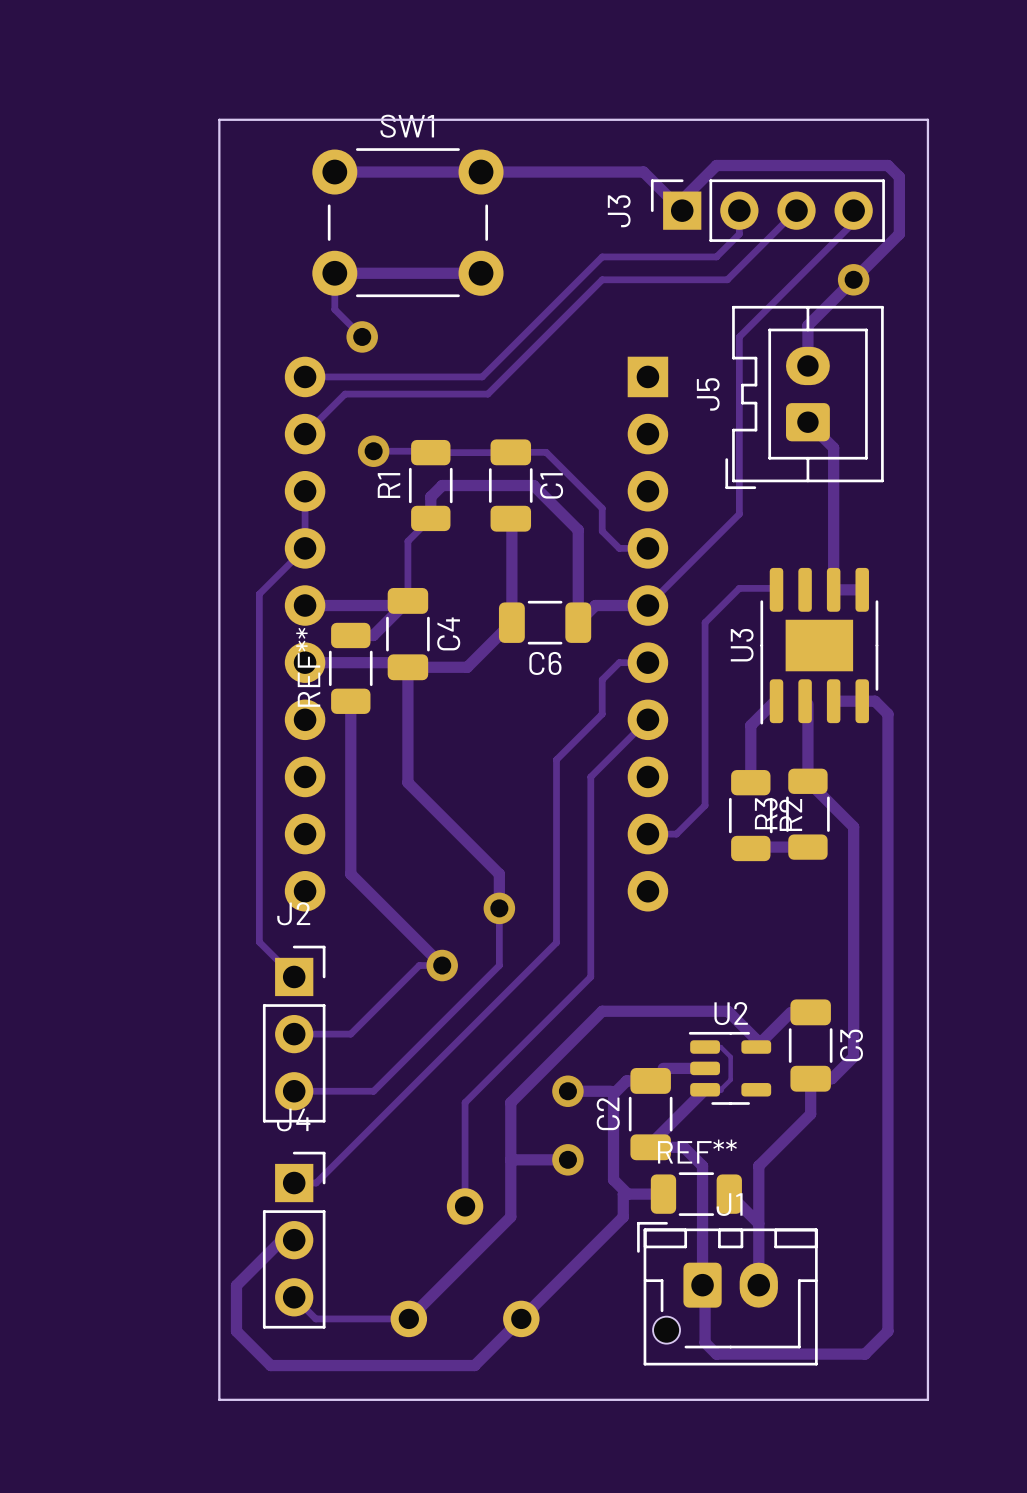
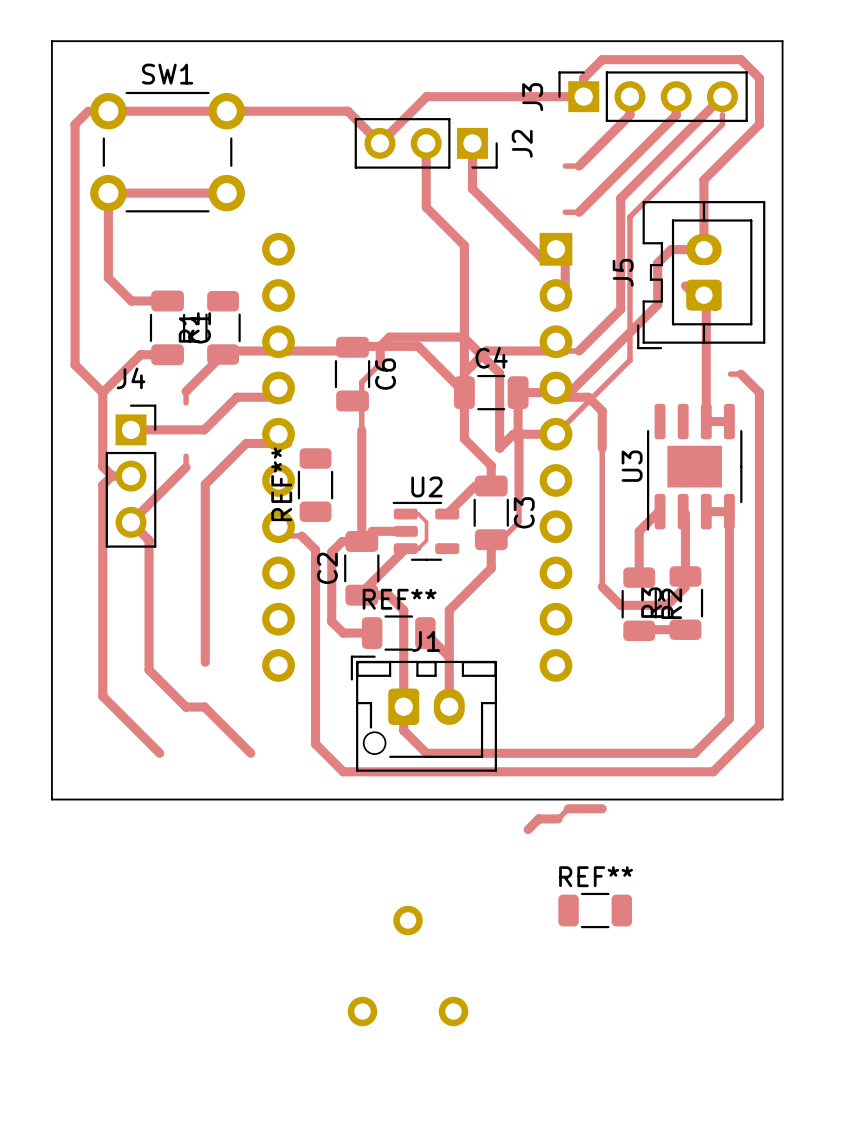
board edge: (219, 119) (219, 1399) (927, 1399) (927, 1056) -> (209, 41) (51, 41) (51, 799) (782, 799)
track: (334, 172) (643, 172) (682, 210) (682, 199) (716, 165) (887, 165) (899, 176) -> (102, 392) (75, 364) (75, 124) (88, 111) (347, 111) (379, 143) (426, 96) (583, 96) (583, 78) (602, 59) (740, 59) (759, 78) (759, 87)
track: none -> (629, 87) (629, 115) (579, 166) (565, 166)
track: none -> (676, 87) (676, 115) (579, 212) (565, 212)
track: none -> (722, 96) (620, 198) (620, 309) (579, 350) (486, 350) (464, 373) (464, 392) (418, 346) (353, 346) (348, 350) (226, 350) (186, 391) (186, 402)
J3 position: (767, 210) -> (653, 96)
track: (796, 210) (727, 279) (602, 279) (487, 394) (345, 394) (305, 434) -> none
track: (739, 211) (739, 234) (716, 256) (602, 256) (482, 376) (305, 376) -> none
SW1 position: (407, 222) -> (167, 152)
track: (899, 222) (899, 234) (807, 325) (807, 365) -> (759, 124) (703, 179) (703, 249) (671, 249) (657, 263) (657, 304) (565, 397)
track: none -> (426, 143) (426, 207) (464, 245) (464, 438) (491, 465) (491, 485) (475, 485) (447, 514)
track: none -> (472, 143) (472, 188) (542, 258) (565, 258) (565, 304)
track: (481, 273) (334, 273) (334, 309) (362, 336) -> none
via: (853, 279) -> none
track: none -> (226, 193) (108, 193) (108, 277) (131, 301) (167, 301)
via: (362, 336) -> none
J5 position: (804, 397) -> (701, 275)
track: (373, 451) (510, 452) -> none
via: (373, 451) -> none
track: (510, 452) (546, 452) (602, 508) (602, 531) (619, 548) (647, 548) -> none
R1 position: (430, 485) -> (223, 327)
C1 position: (510, 485) -> (167, 327)
track: (305, 491) (305, 548) (259, 594) (259, 942) (294, 976) -> none
track: none -> (167, 354) (140, 354) (102, 392)
track: (510, 518) (511, 622) (467, 667) (407, 667) (403, 662) (305, 662) -> none
track: none -> (102, 392) (102, 466) (112, 476) (131, 476) (130, 475) (112, 475) (102, 485) (102, 696) (159, 753)
track: none -> (287, 397) (236, 397) (204, 429) (131, 429)
track: (776, 589) (739, 588) (705, 622) -> (565, 397) (588, 397) (602, 411) (602, 448)
track: none -> (361, 430) (361, 484)
track: (305, 605) (403, 605) (407, 600) (373, 635) (350, 635) -> none
track: none -> (287, 443) (246, 443) (205, 484) (205, 662)
C6 rotation: 0° (545, 622) -> 90° clockwise (352, 374)
C6 position: (545, 622) -> (352, 374)
track: none -> (186, 456) (186, 467) (131, 522) (149, 540) (149, 670) (186, 707) (204, 707) (250, 753)
C4 name position: C4 (448, 633) -> C4 (491, 357)
C4 rotation: 0° (407, 634) -> 90° clockwise (491, 392)
C4 position: (407, 634) -> (491, 392)
track: (647, 662) (619, 662) (602, 679) -> (565, 397) (560, 392) (518, 392) (518, 494)
C6 name position: C6 (545, 663) -> C6 (385, 374)
track: (350, 701) (350, 748) -> (287, 535) (301, 535) (315, 549)
track: (862, 701) (875, 701) (887, 714) (887, 1331) (865, 1354) (716, 1354) (705, 1342) (705, 1287) (702, 1285) (702, 1165) (683, 1147) (650, 1147) (650, 1144) (705, 1089) (720, 1089) (730, 1079) (730, 1056) (720, 1047) (705, 1047) -> (729, 511) (729, 718) (694, 753) (426, 753) (403, 730) (403, 610) (388, 595) (361, 595) (361, 592) (405, 548) (418, 548) (426, 540) (426, 522) (418, 514) (405, 514)
track: (647, 719) (590, 776) (590, 976) (465, 1102) (465, 1206) -> none
track: none -> (404, 532) (371, 531) (361, 541) (342, 541) (331, 552) (331, 621) (343, 633) (372, 633)
track: (580, 735) (556, 759) (556, 942) (316, 1183) (294, 1183) -> (501, 539) (491, 539) (491, 568) (449, 610) (449, 706) (449, 656) (425, 633)
track: (407, 738) (407, 782) (499, 874) (499, 965) (373, 1091) (294, 1091) -> none
track: (807, 781) (853, 827) (853, 1056) (831, 1078) (810, 1078) (810, 1114) (758, 1165) (758, 1285) (758, 1223) (729, 1194) -> none
track: (705, 794) (705, 805) (676, 834) (647, 834) -> (602, 586) (620, 605) (666, 605) (685, 586) (685, 576)
REF**: none -> (398, 633)
track: (350, 874) (442, 965) (419, 965) (350, 1034) (294, 1034) -> (315, 651) (315, 744) (343, 771) (713, 771) (759, 725) (759, 392) (740, 374) (730, 374)
via: (499, 908) -> none
via: (442, 965) -> none
track: (810, 1012) (790, 1012) (756, 1047) (756, 1039) (727, 1011) (602, 1011) (510, 1102) (510, 1216) (408, 1318) (315, 1318) (294, 1297) -> none
J2 rotation: 0° (294, 1034) -> 90° clockwise (426, 143)
J2 position: (294, 1034) -> (426, 143)
C3 position: (810, 1045) -> (491, 512)
U2 position: (729, 1068) -> (425, 531)
track: (567, 1091) (610, 1091) (613, 1094) (613, 1179) (627, 1194) -> none
via: (567, 1091) -> none
C2 position: (650, 1114) -> (361, 568)
track: (510, 1159) (567, 1159) -> none
via: (567, 1159) -> none
track: (663, 1194) (623, 1194) (623, 1216) (474, 1365) (270, 1365) (236, 1331) (236, 1285) (281, 1240) (294, 1240) -> none
J4 position: (294, 1240) -> (131, 476)
J1 position: (727, 1293) -> (423, 713)

